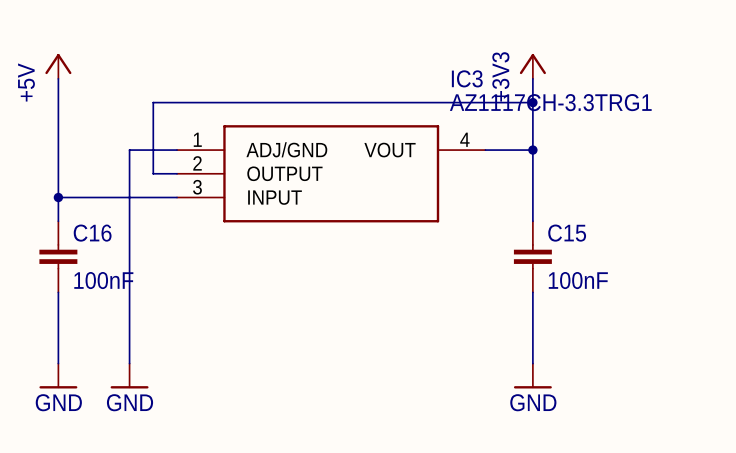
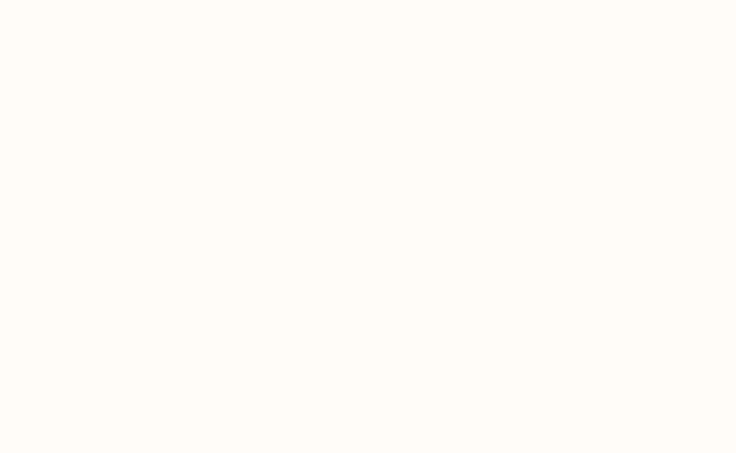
power symbol: +5V (58, 66) -> none
power symbol: +3V3 (532, 66) -> none
wire: (58, 78) (58, 221) -> none
wire: (532, 78) (532, 221) -> none
wire: (532, 102) (153, 102) (153, 173) (177, 173) -> none
junction: (532, 102) -> none
wire: (177, 150) (129, 150) (129, 363) -> none
wire: (485, 150) (532, 150) -> none
junction: (532, 150) -> none
IC3: AZ1117CH-3.3TRG1 (331, 173) -> none
wire: (58, 197) (177, 197) -> none
junction: (58, 197) -> none
C16: 100nF (58, 256) -> none
C15: 100nF (532, 256) -> none
wire: (58, 292) (58, 363) -> none
wire: (532, 292) (532, 363) -> none
power symbol: GND (58, 376) -> none
power symbol: GND (129, 376) -> none
power symbol: GND (532, 376) -> none

